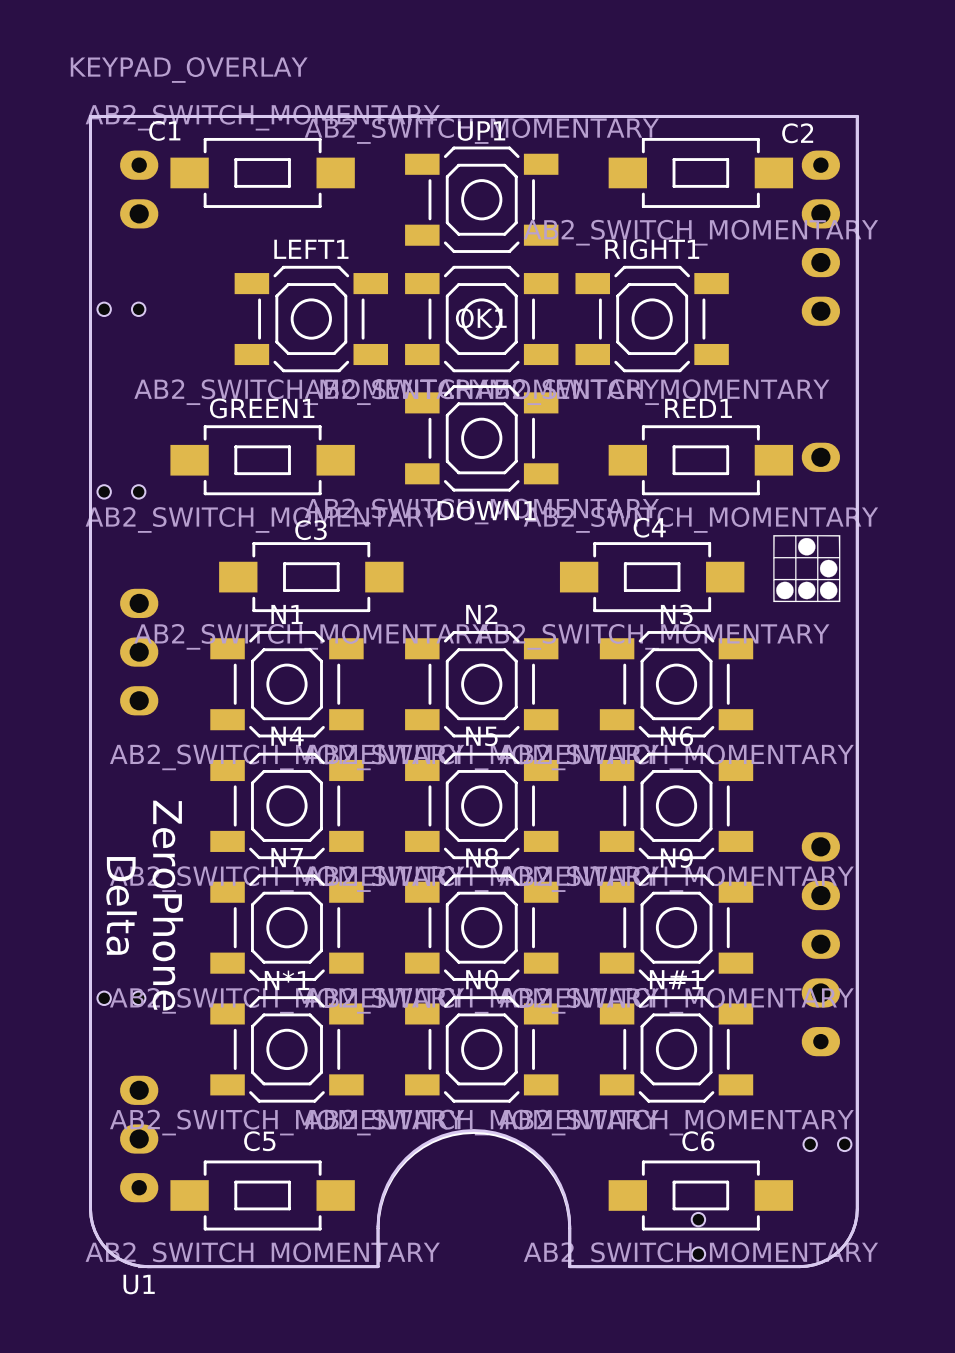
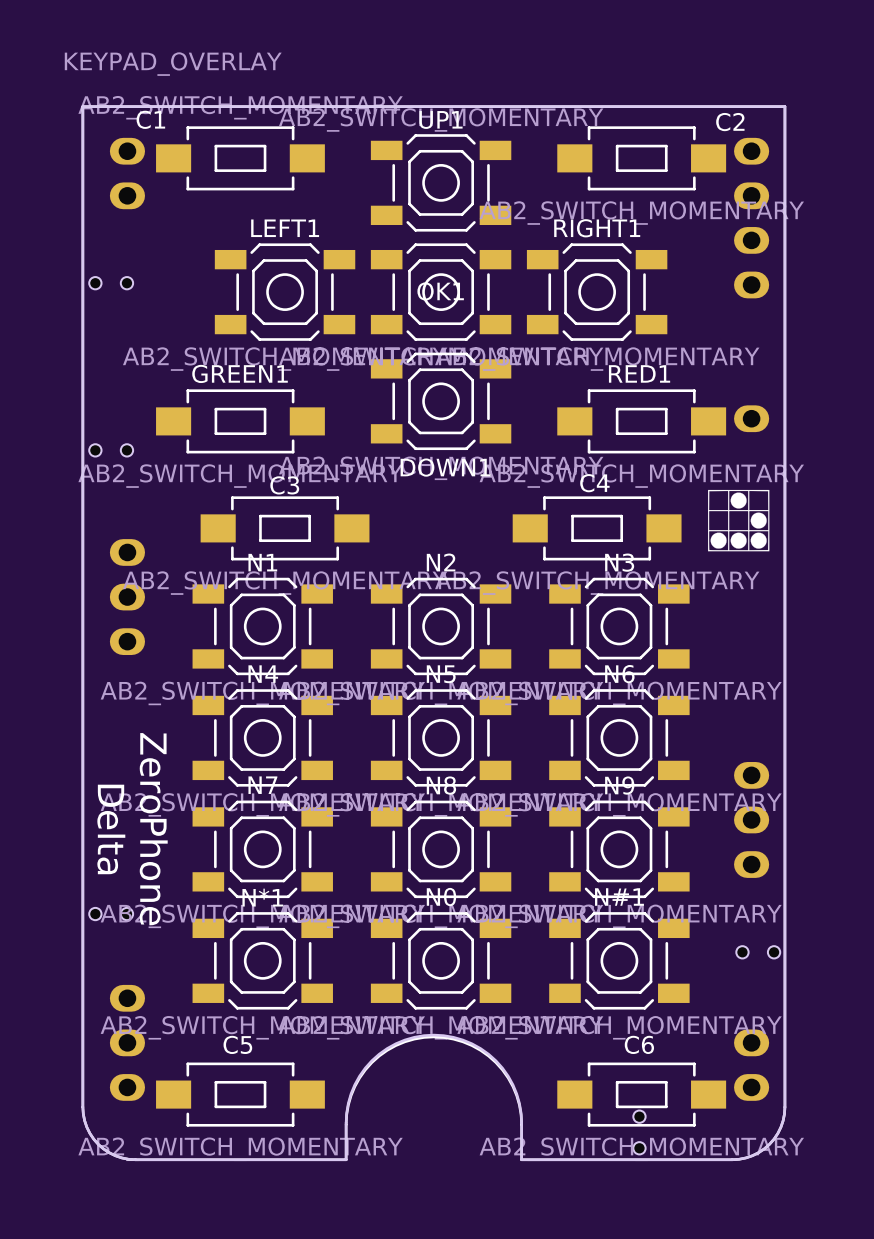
U1: KEYPAD_OVERLAY (473, 691) -> none
part: none -> KEYPAD_OVERLAY (433, 633)
part position: (827, 1144) -> (758, 952)

